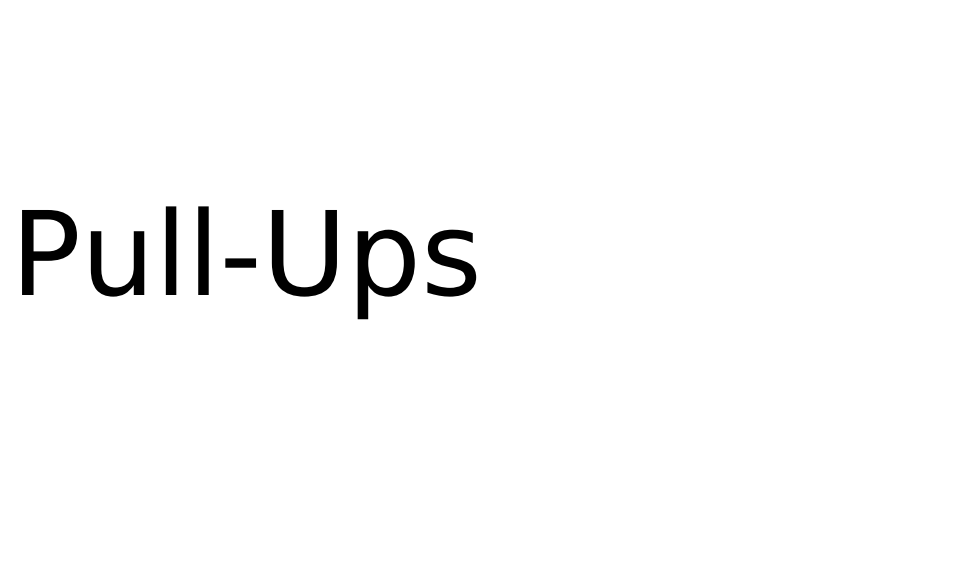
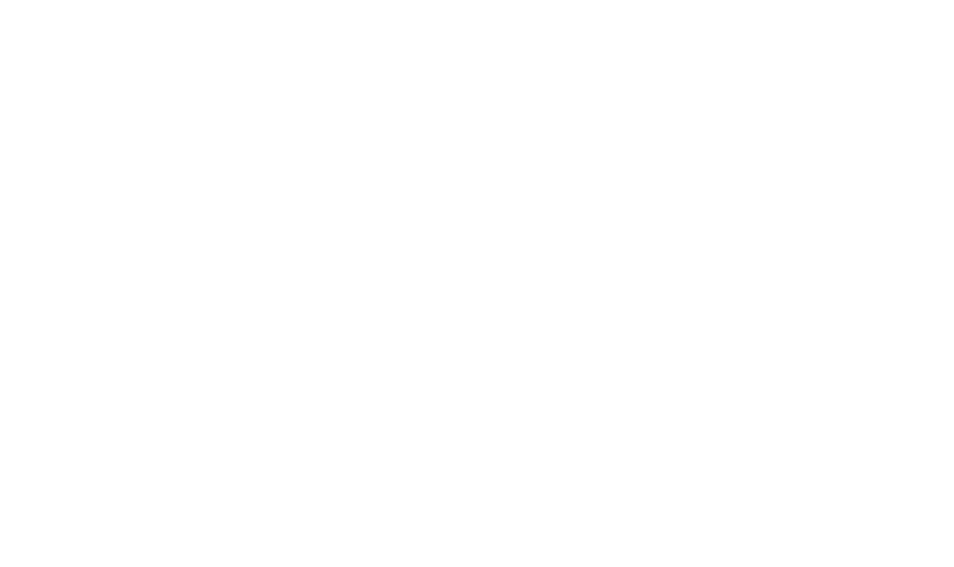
text: Pull-Ups (249, 262) -> none

